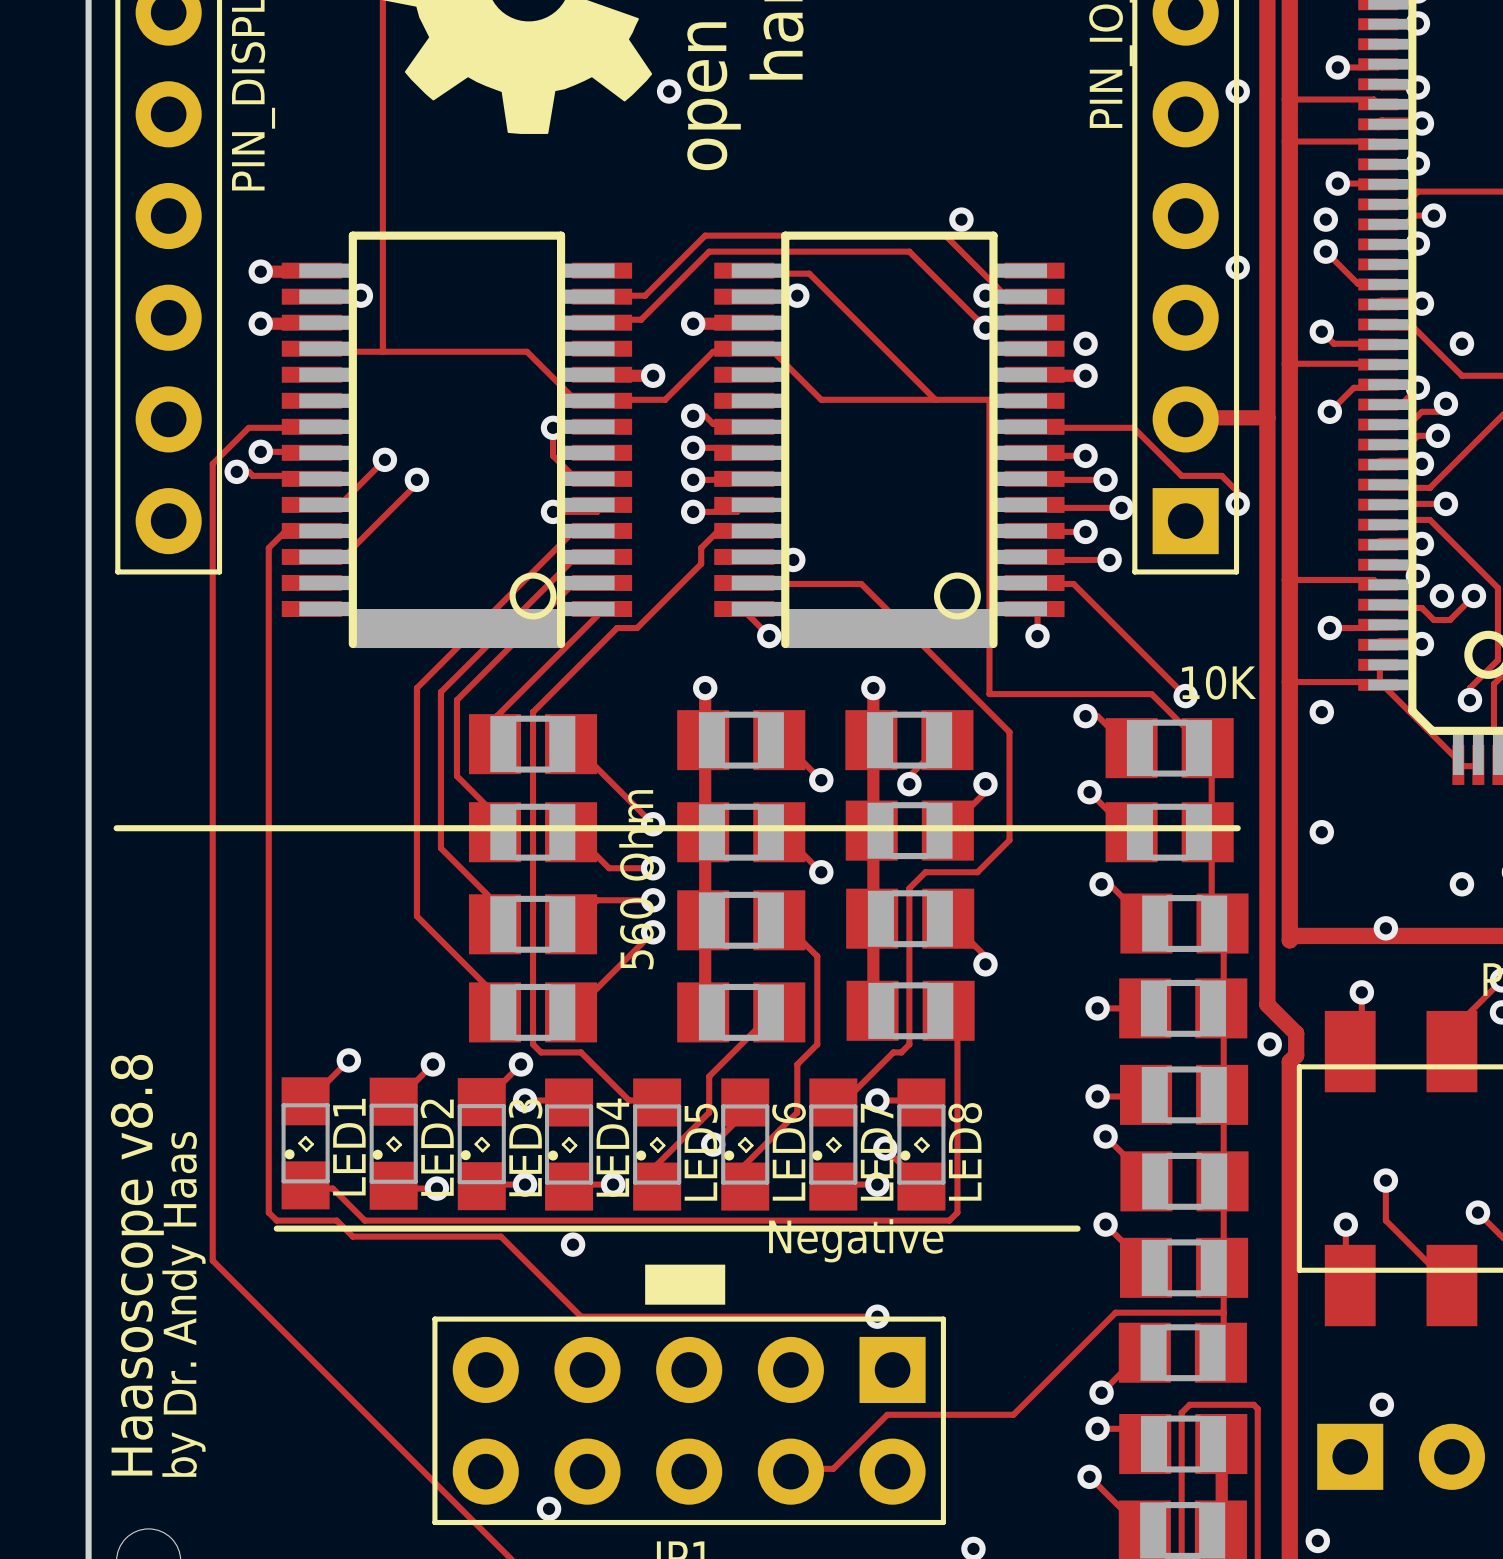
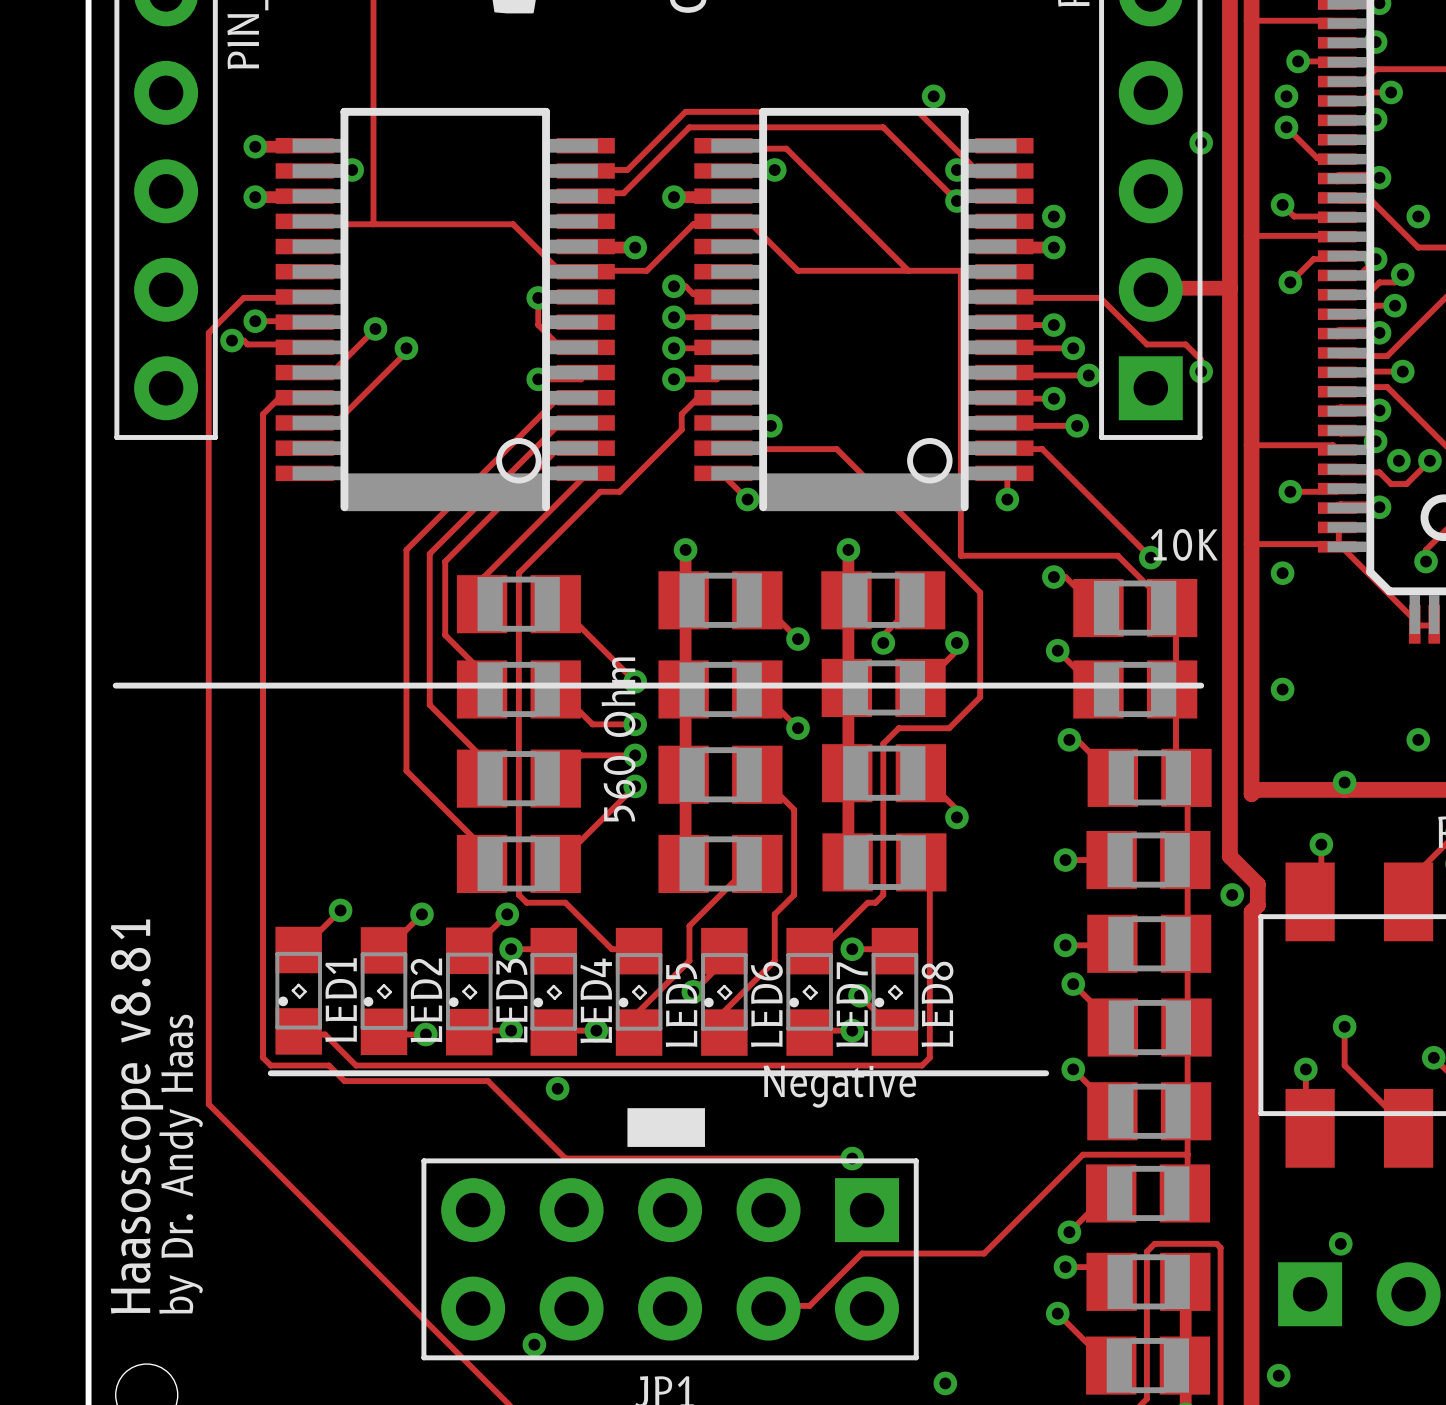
text: Haasoscope v8.8 (137, 1265) -> Haasoscope v8.81 (136, 1116)

